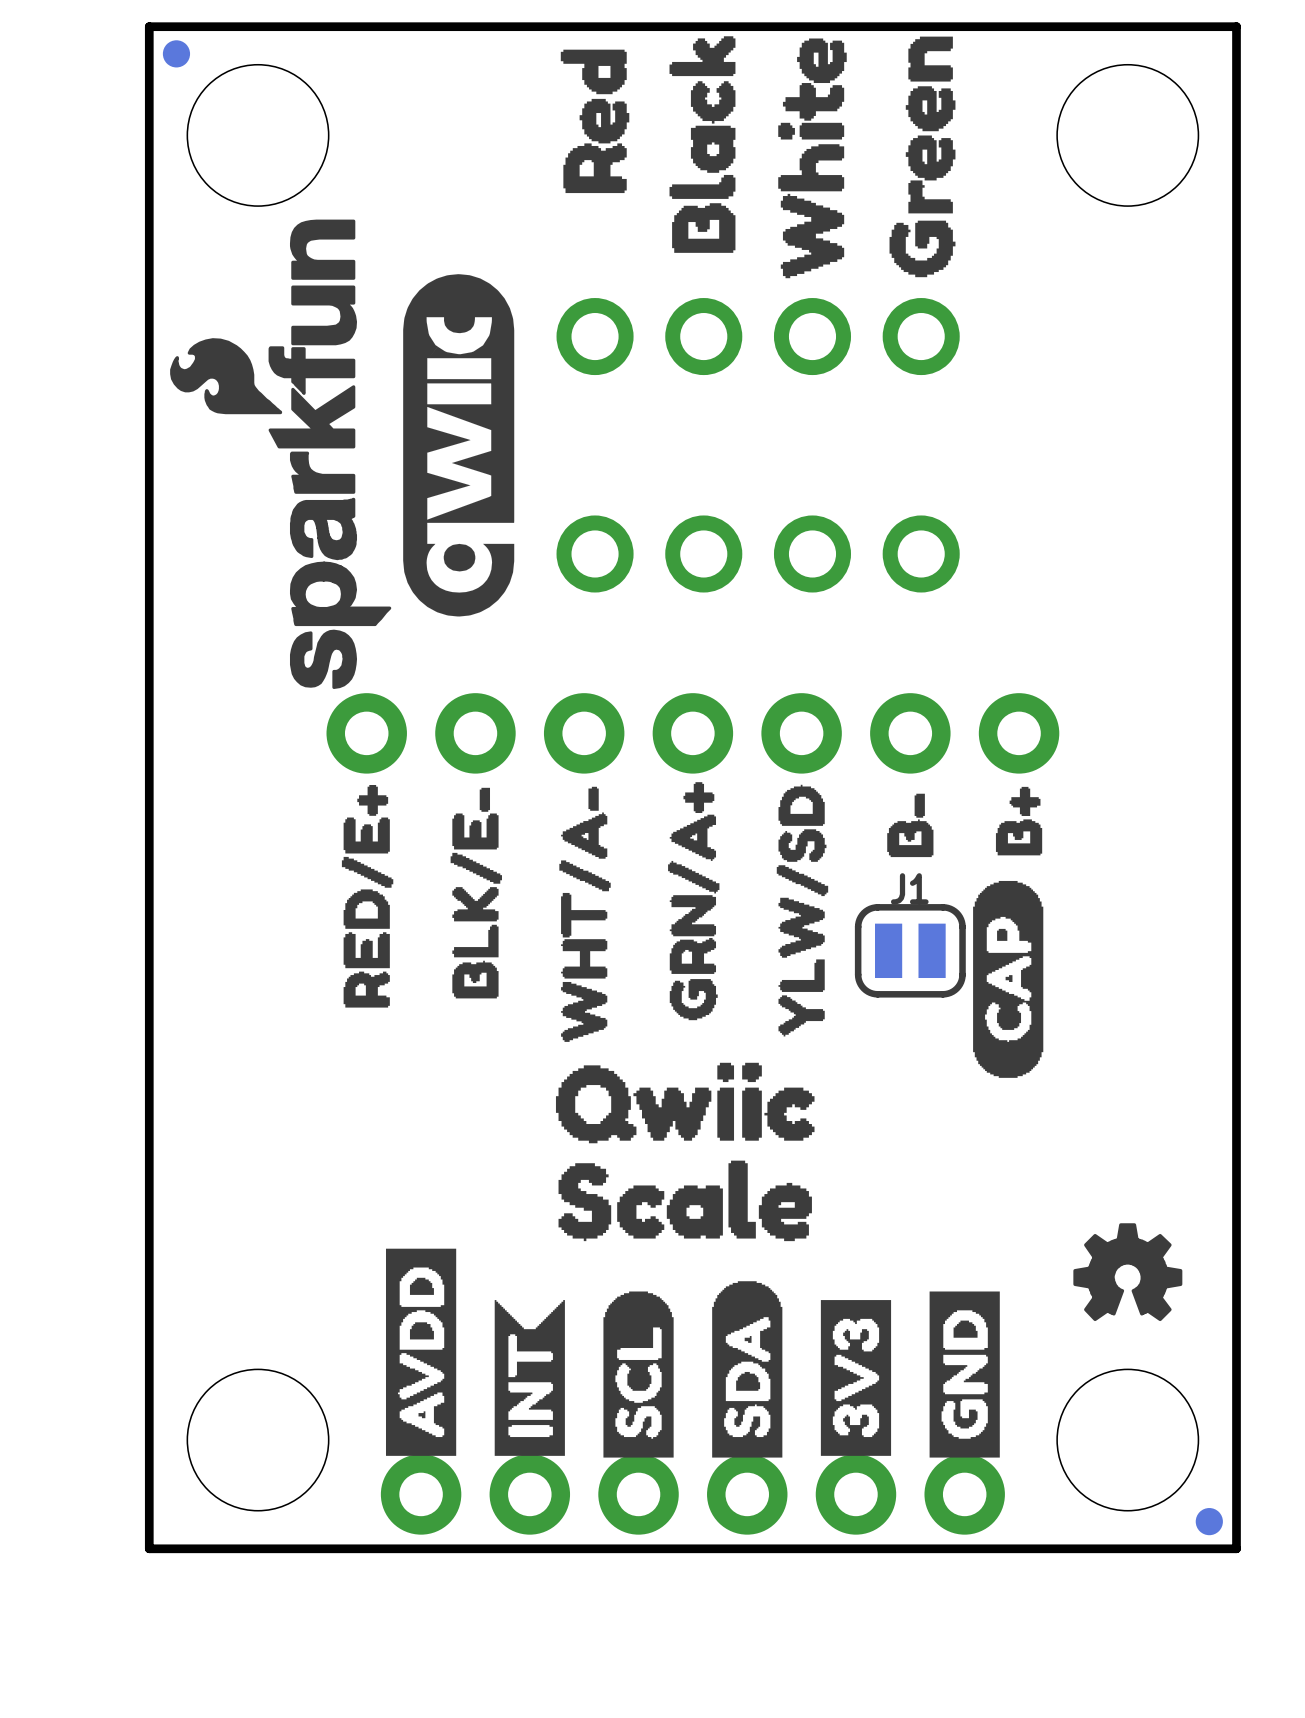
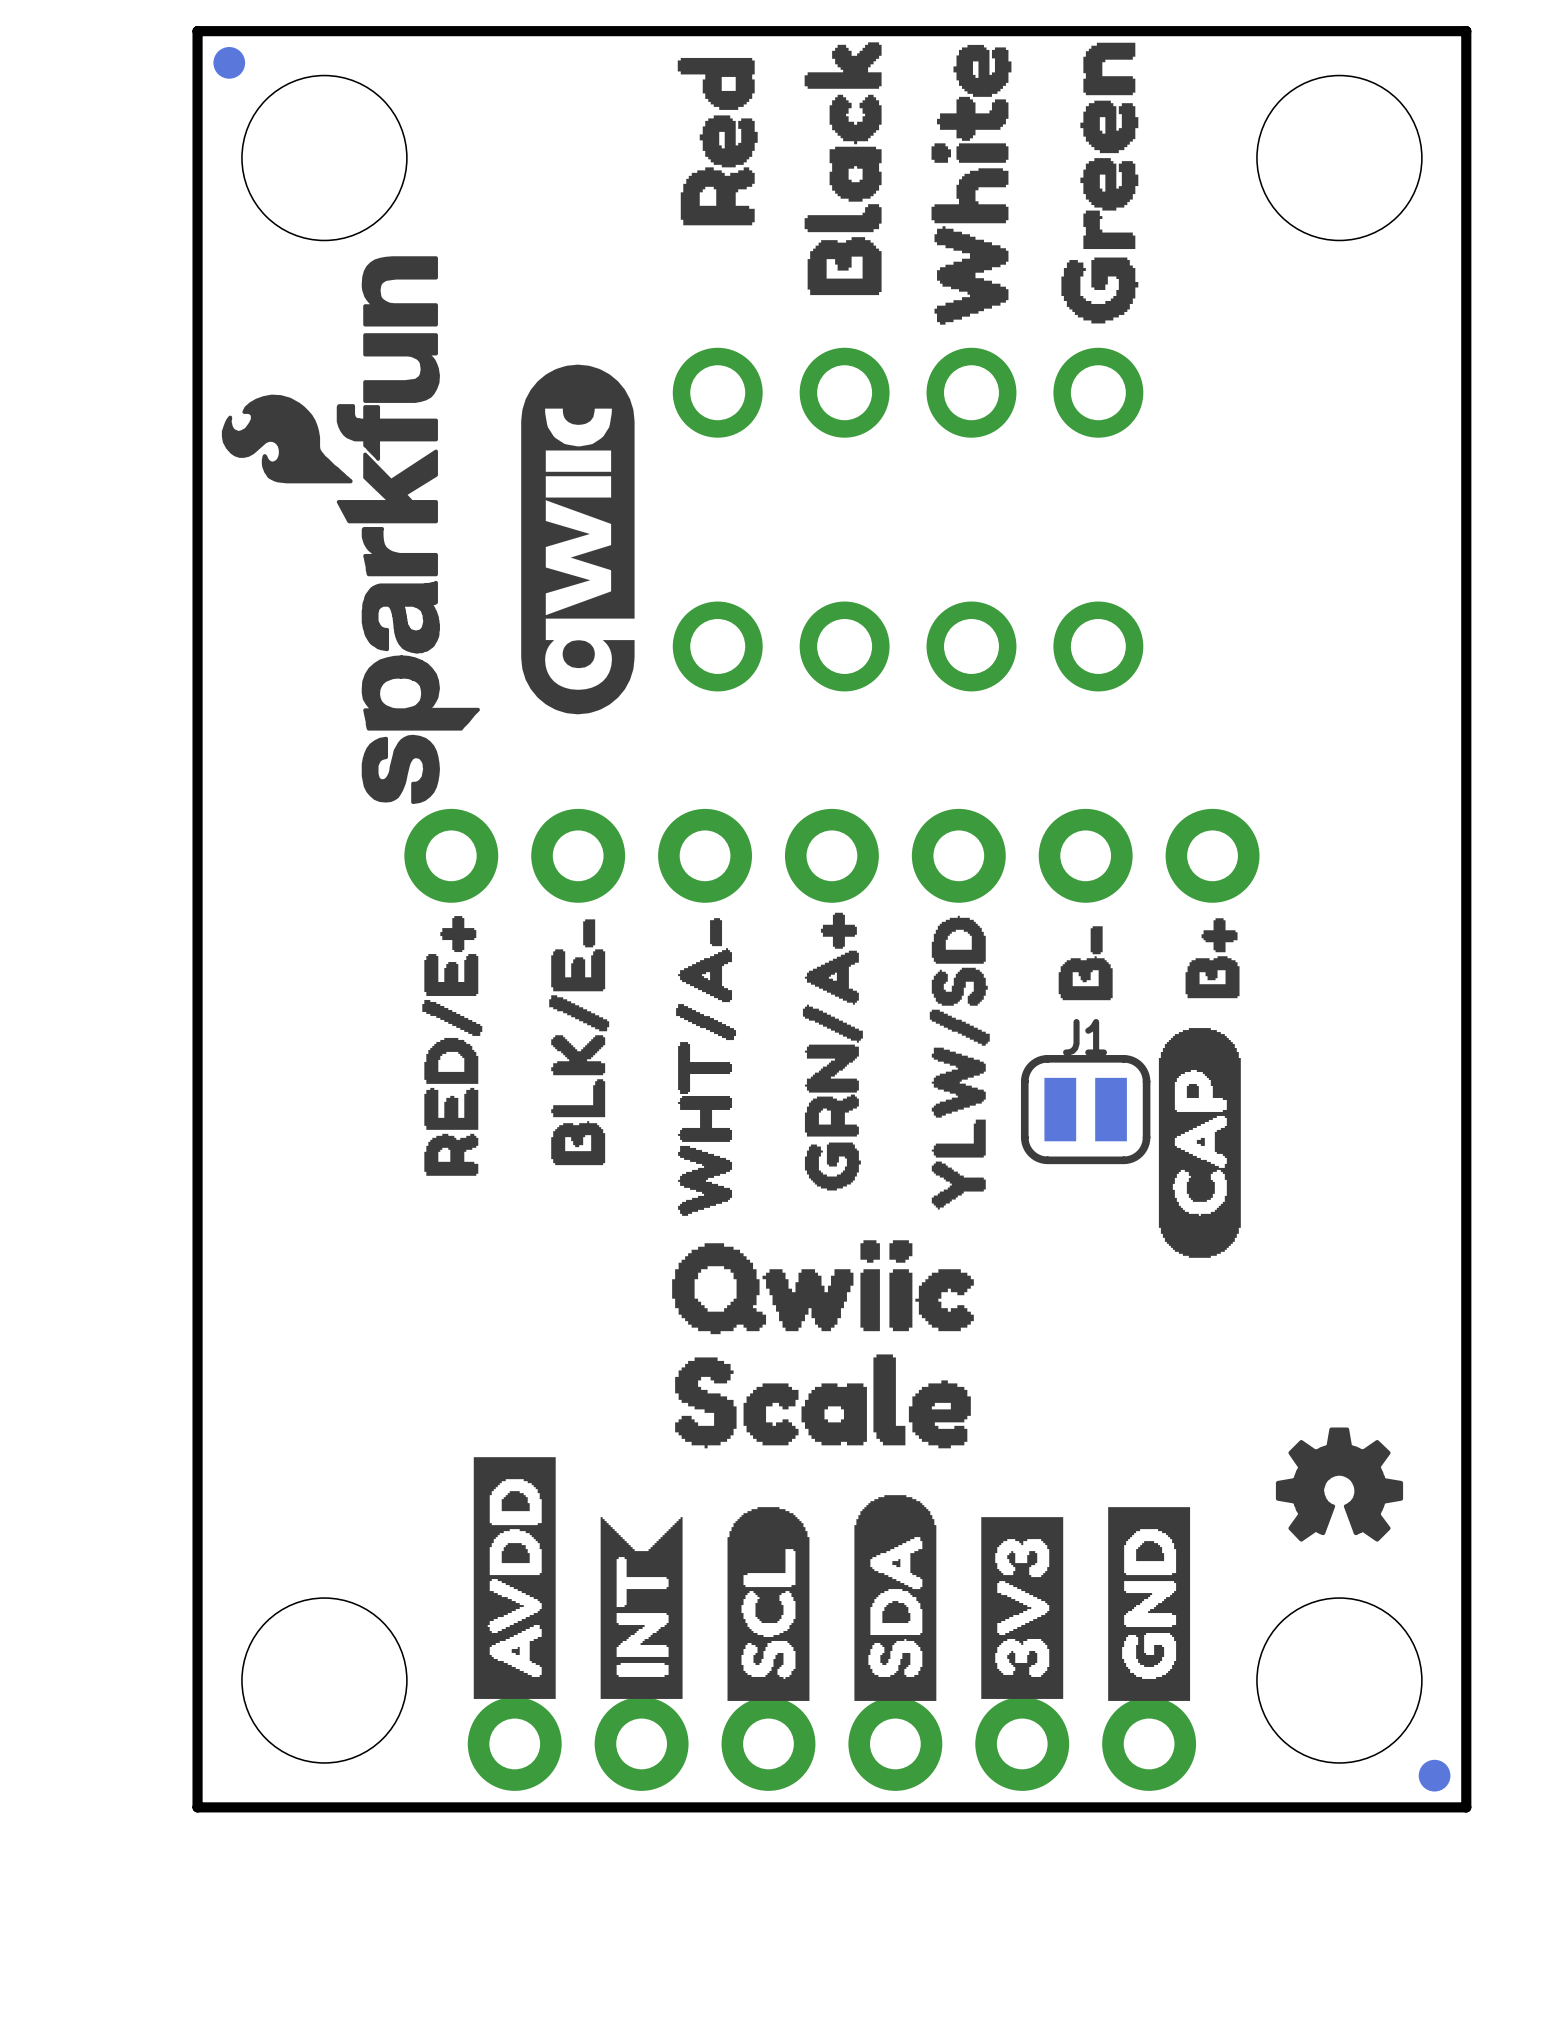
drawing shape: [403, 274, 515, 617] -> [521, 364, 635, 715]

